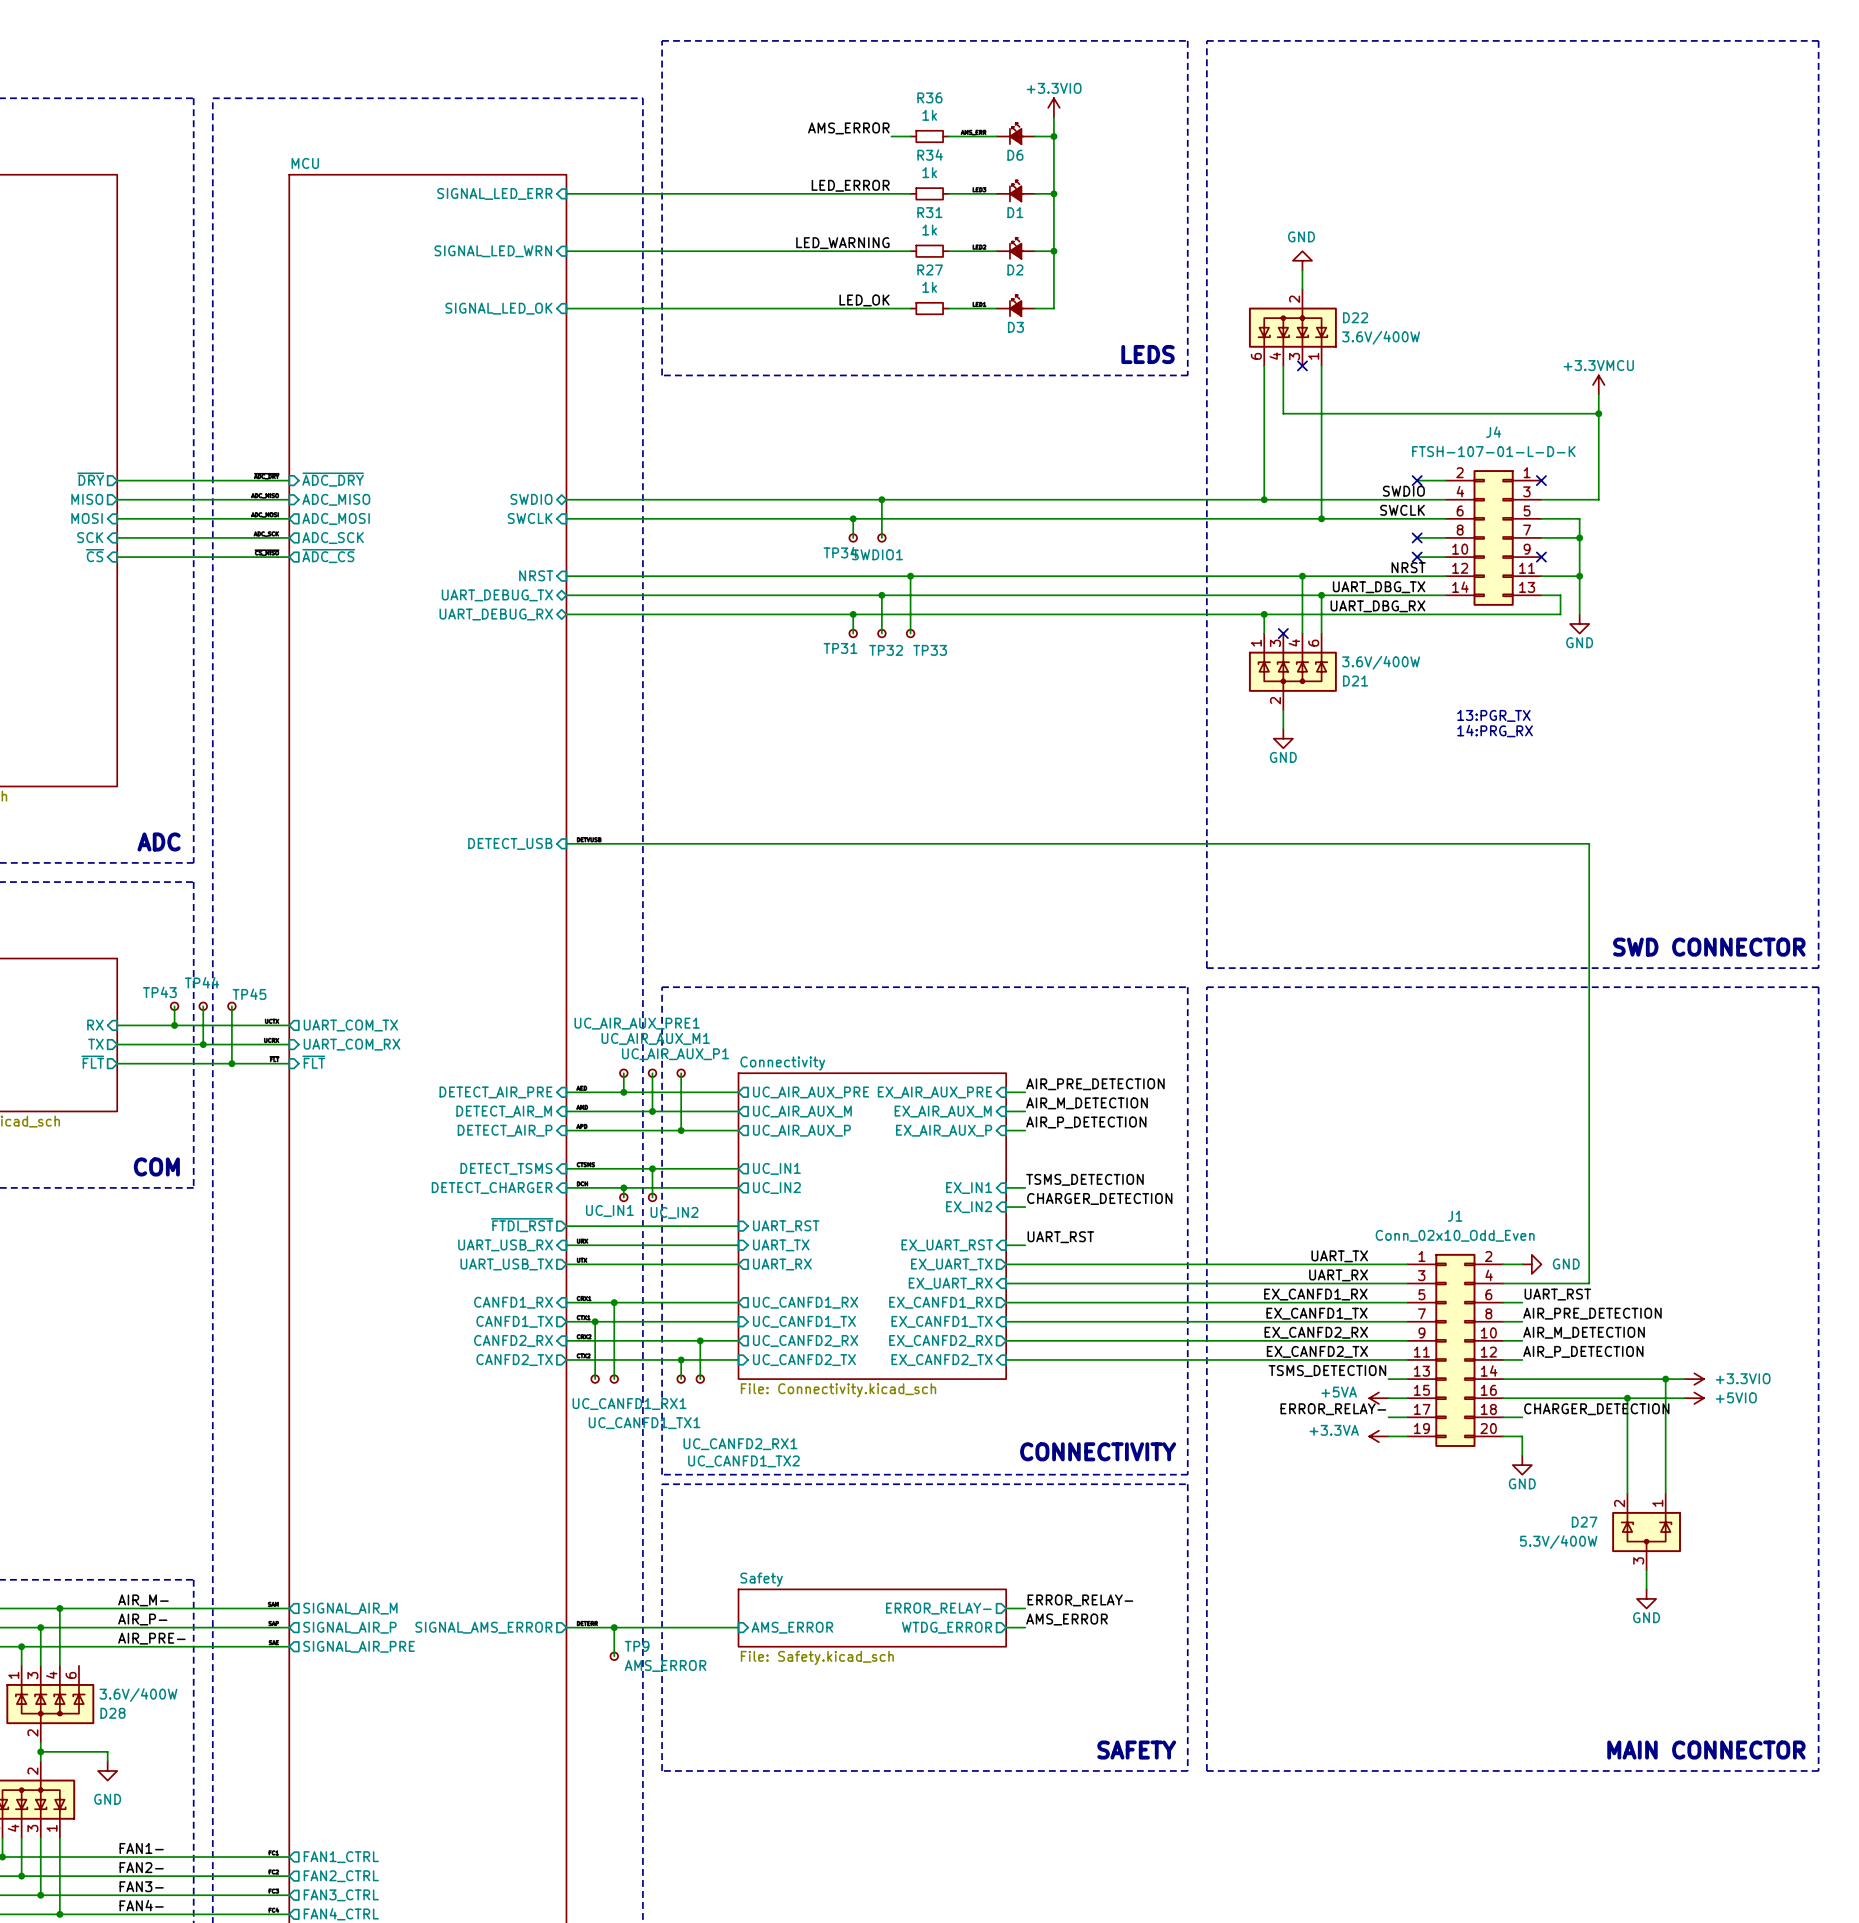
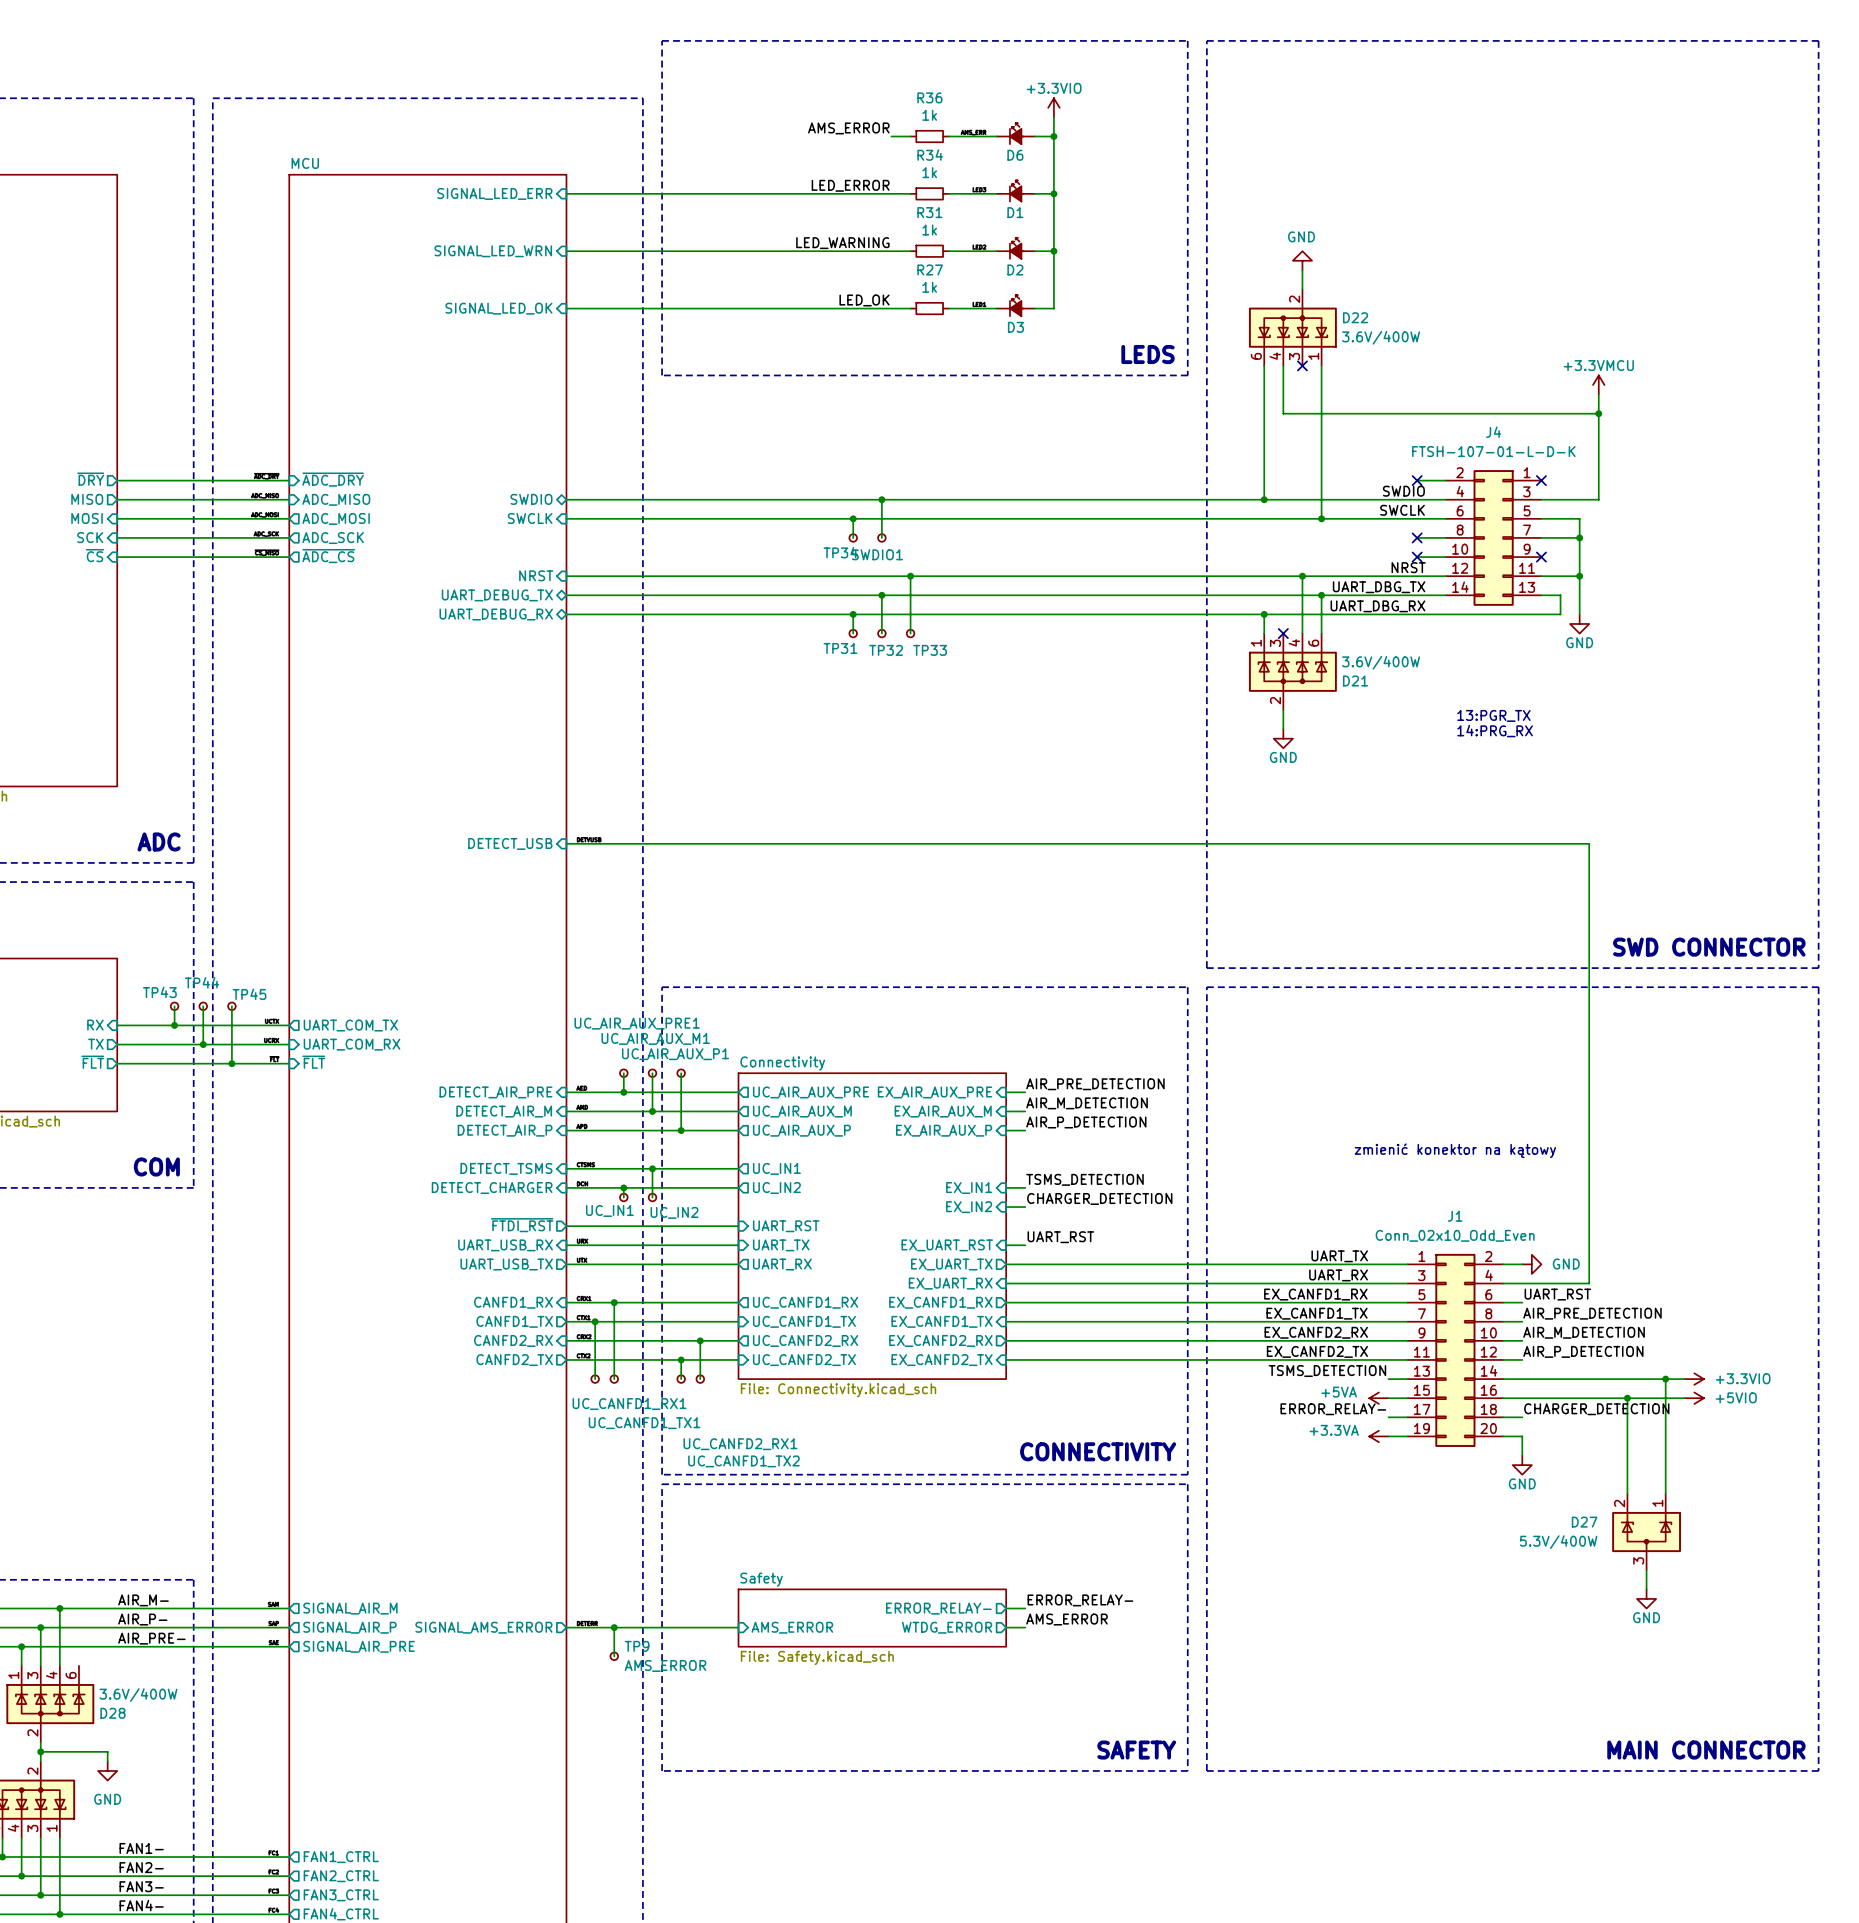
text: none -> zmienić konektor na kątowy (1455, 1150)

